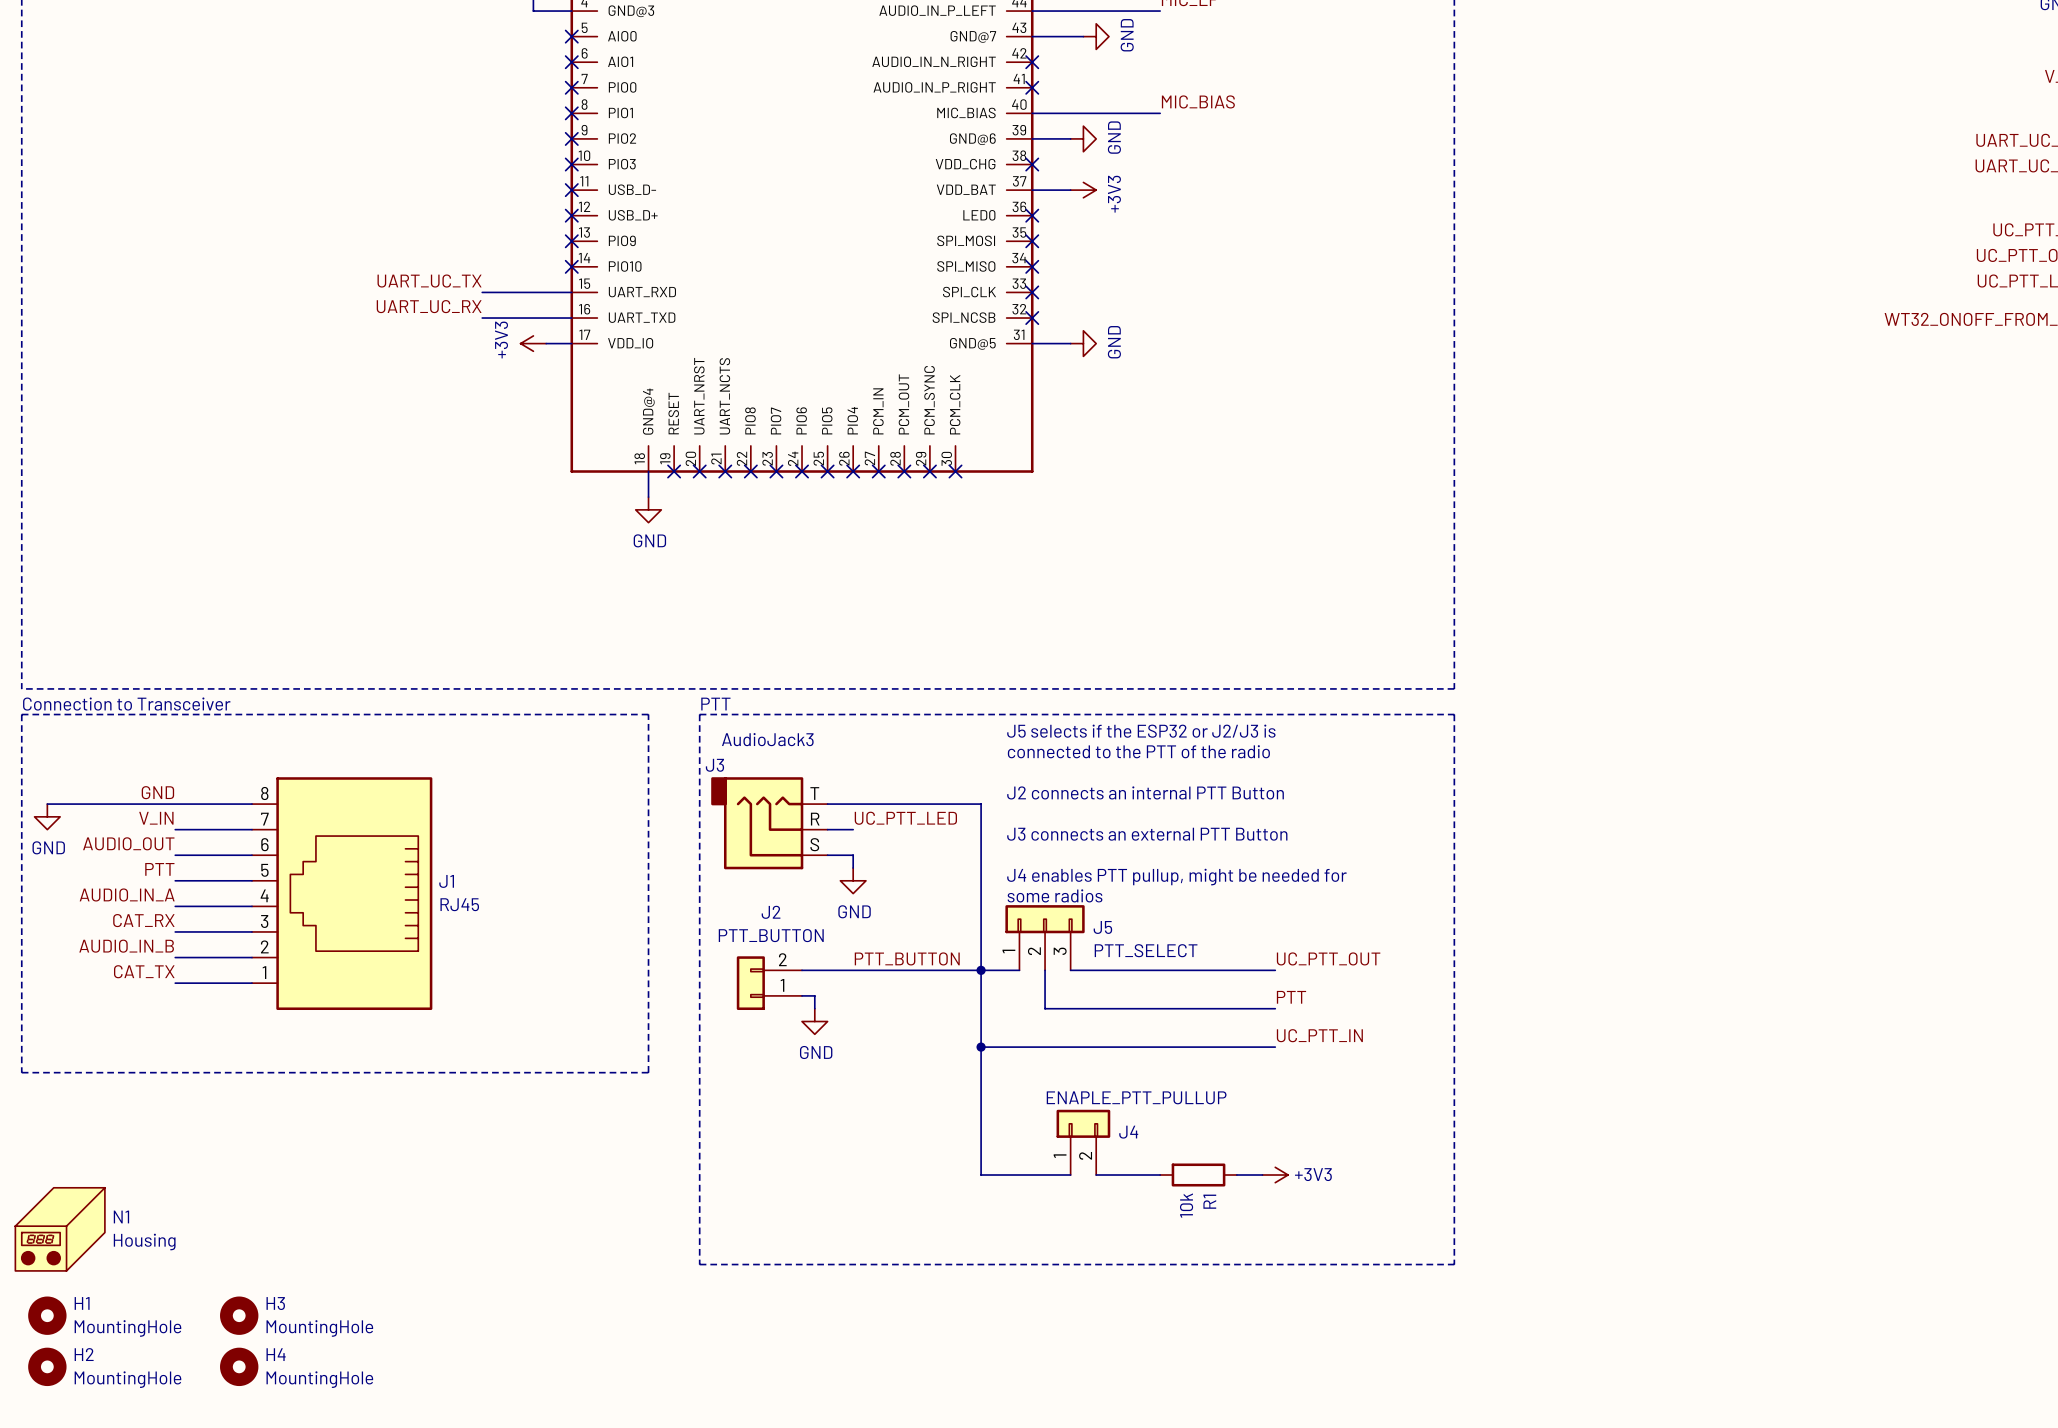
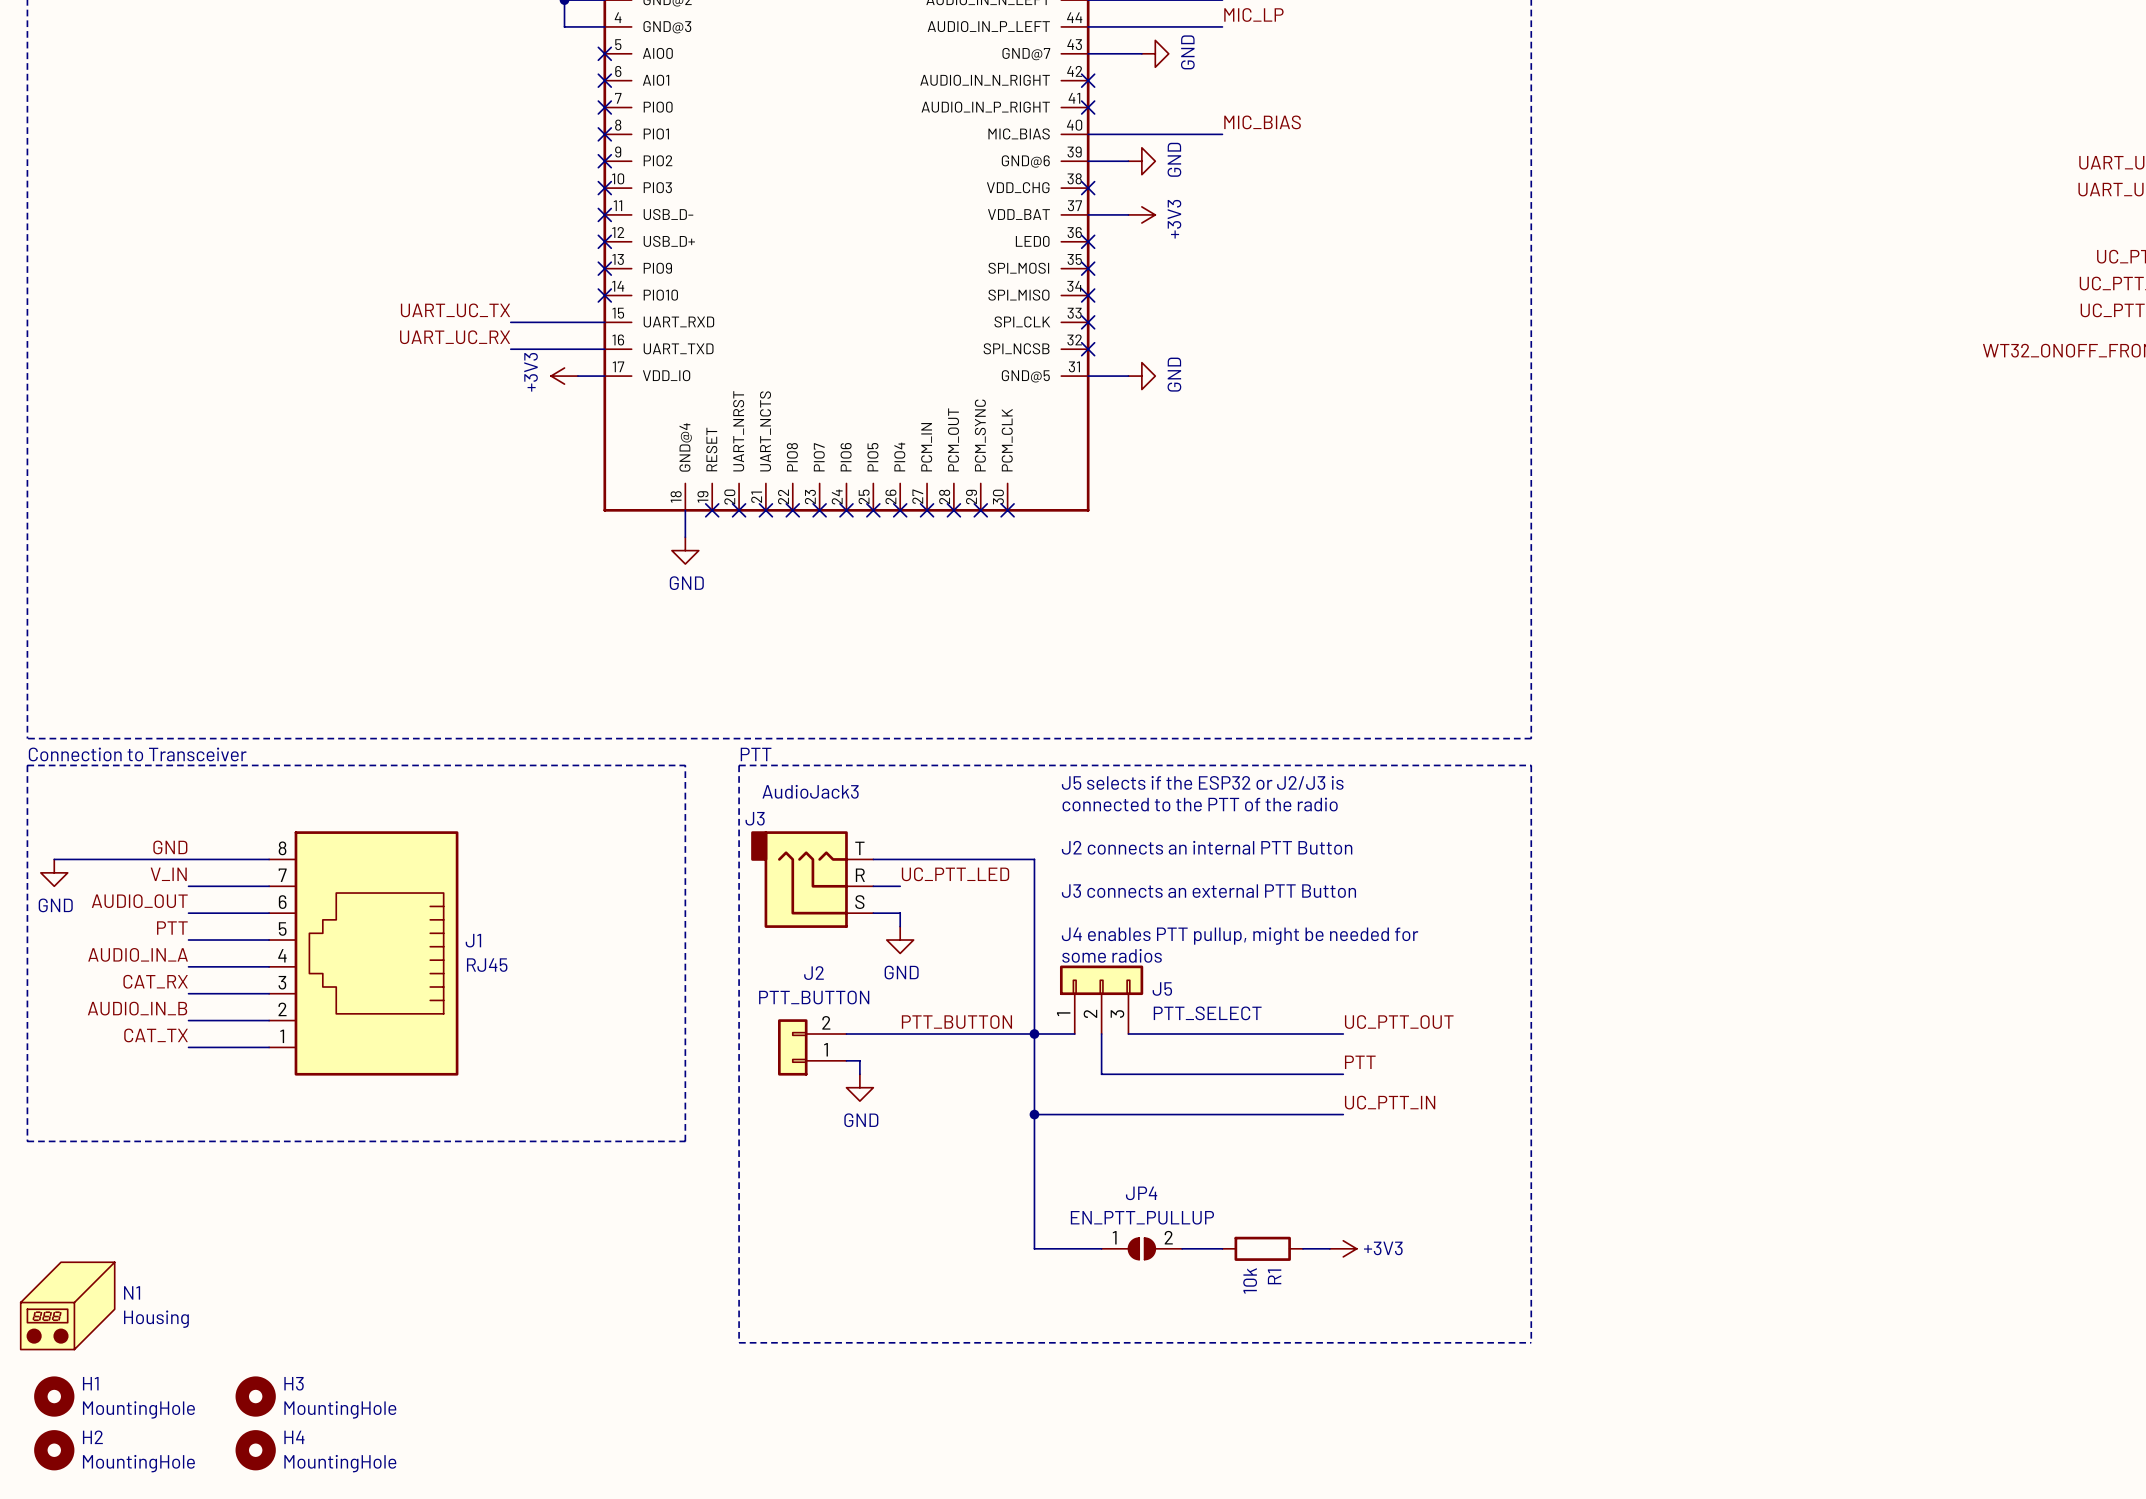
J4: ENAPLE_PTT_PULLUP (1083, 1142) -> none
JP4: none -> EN_PTT_PULLUP (1141, 1248)

